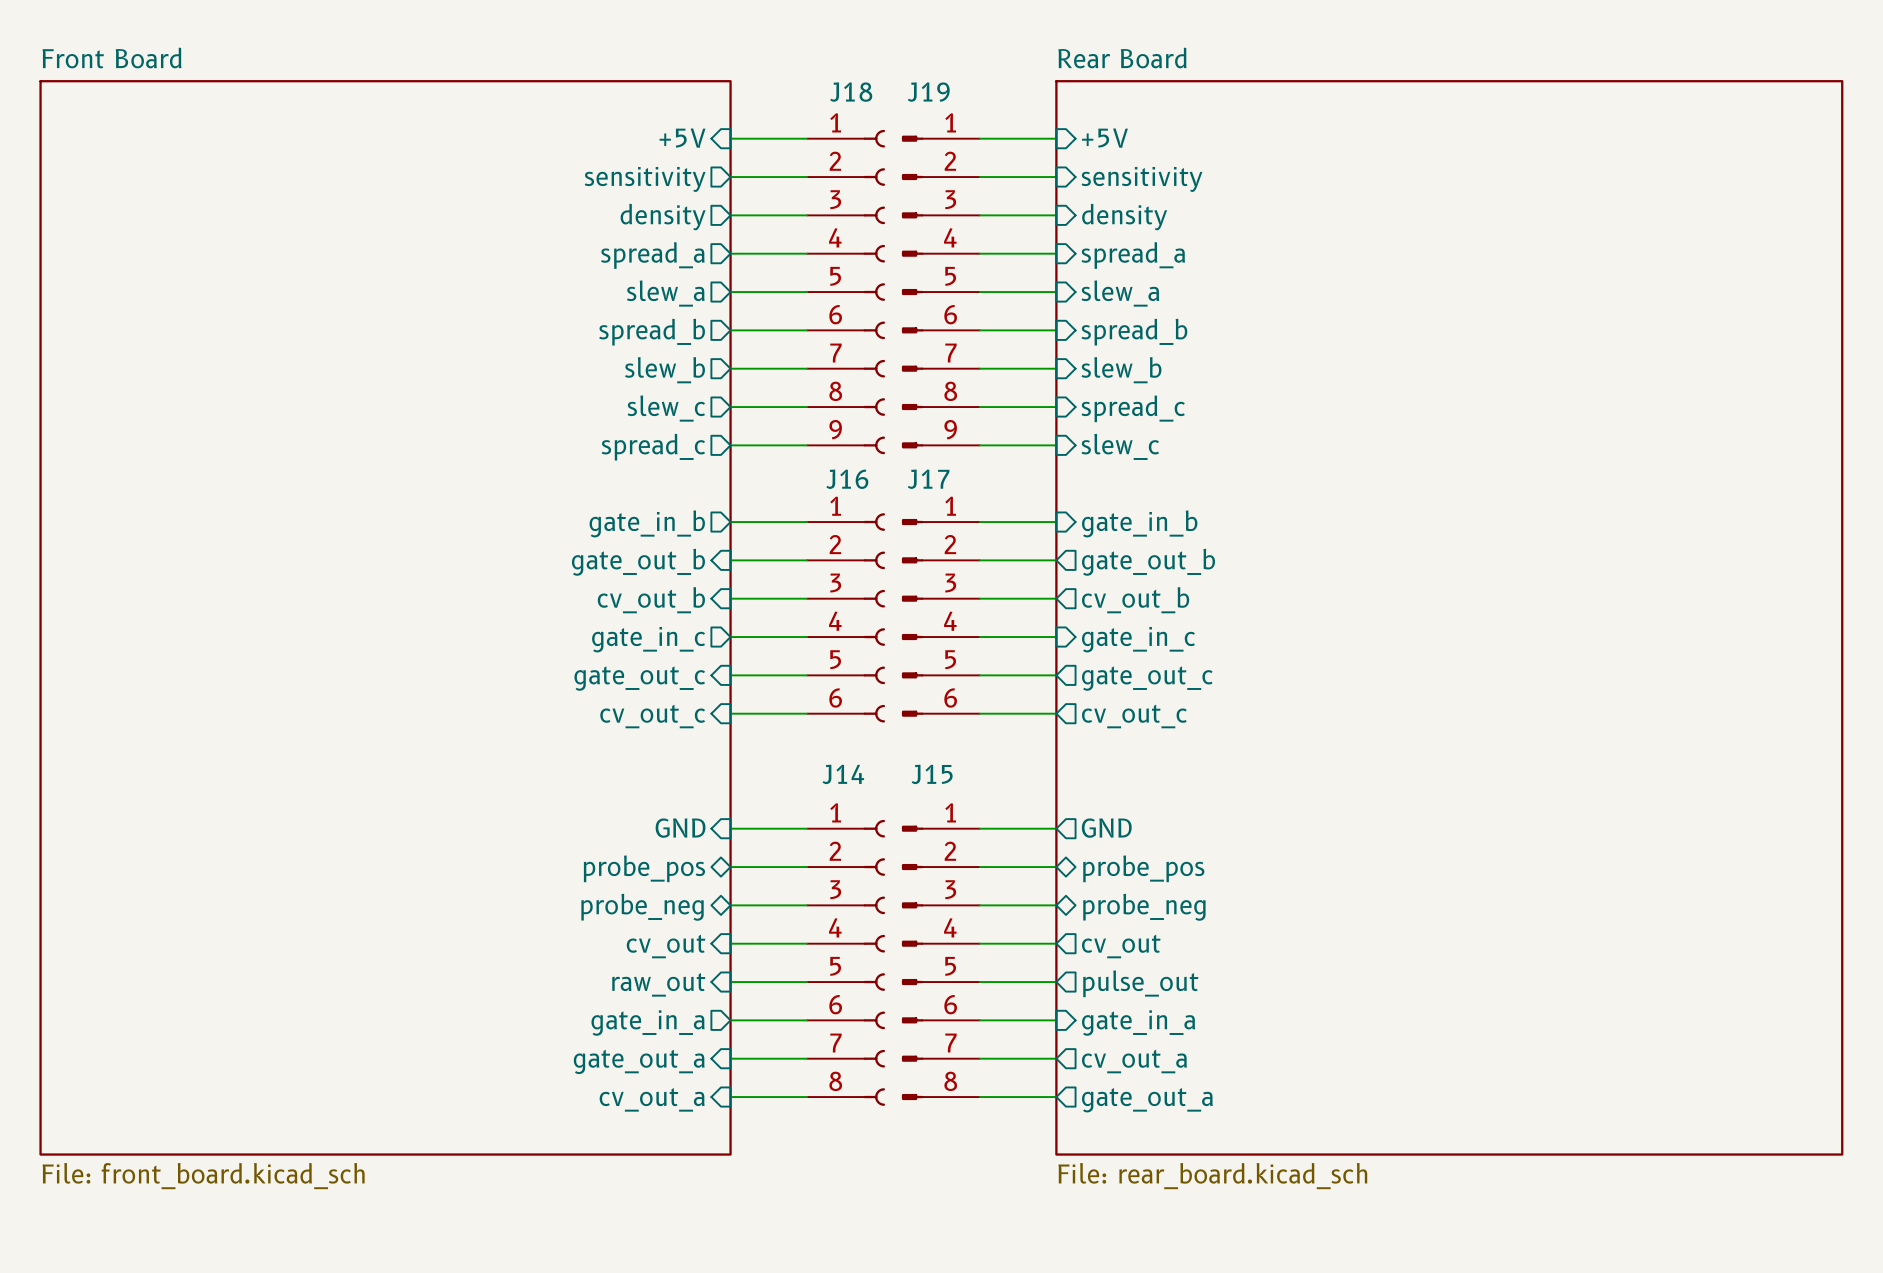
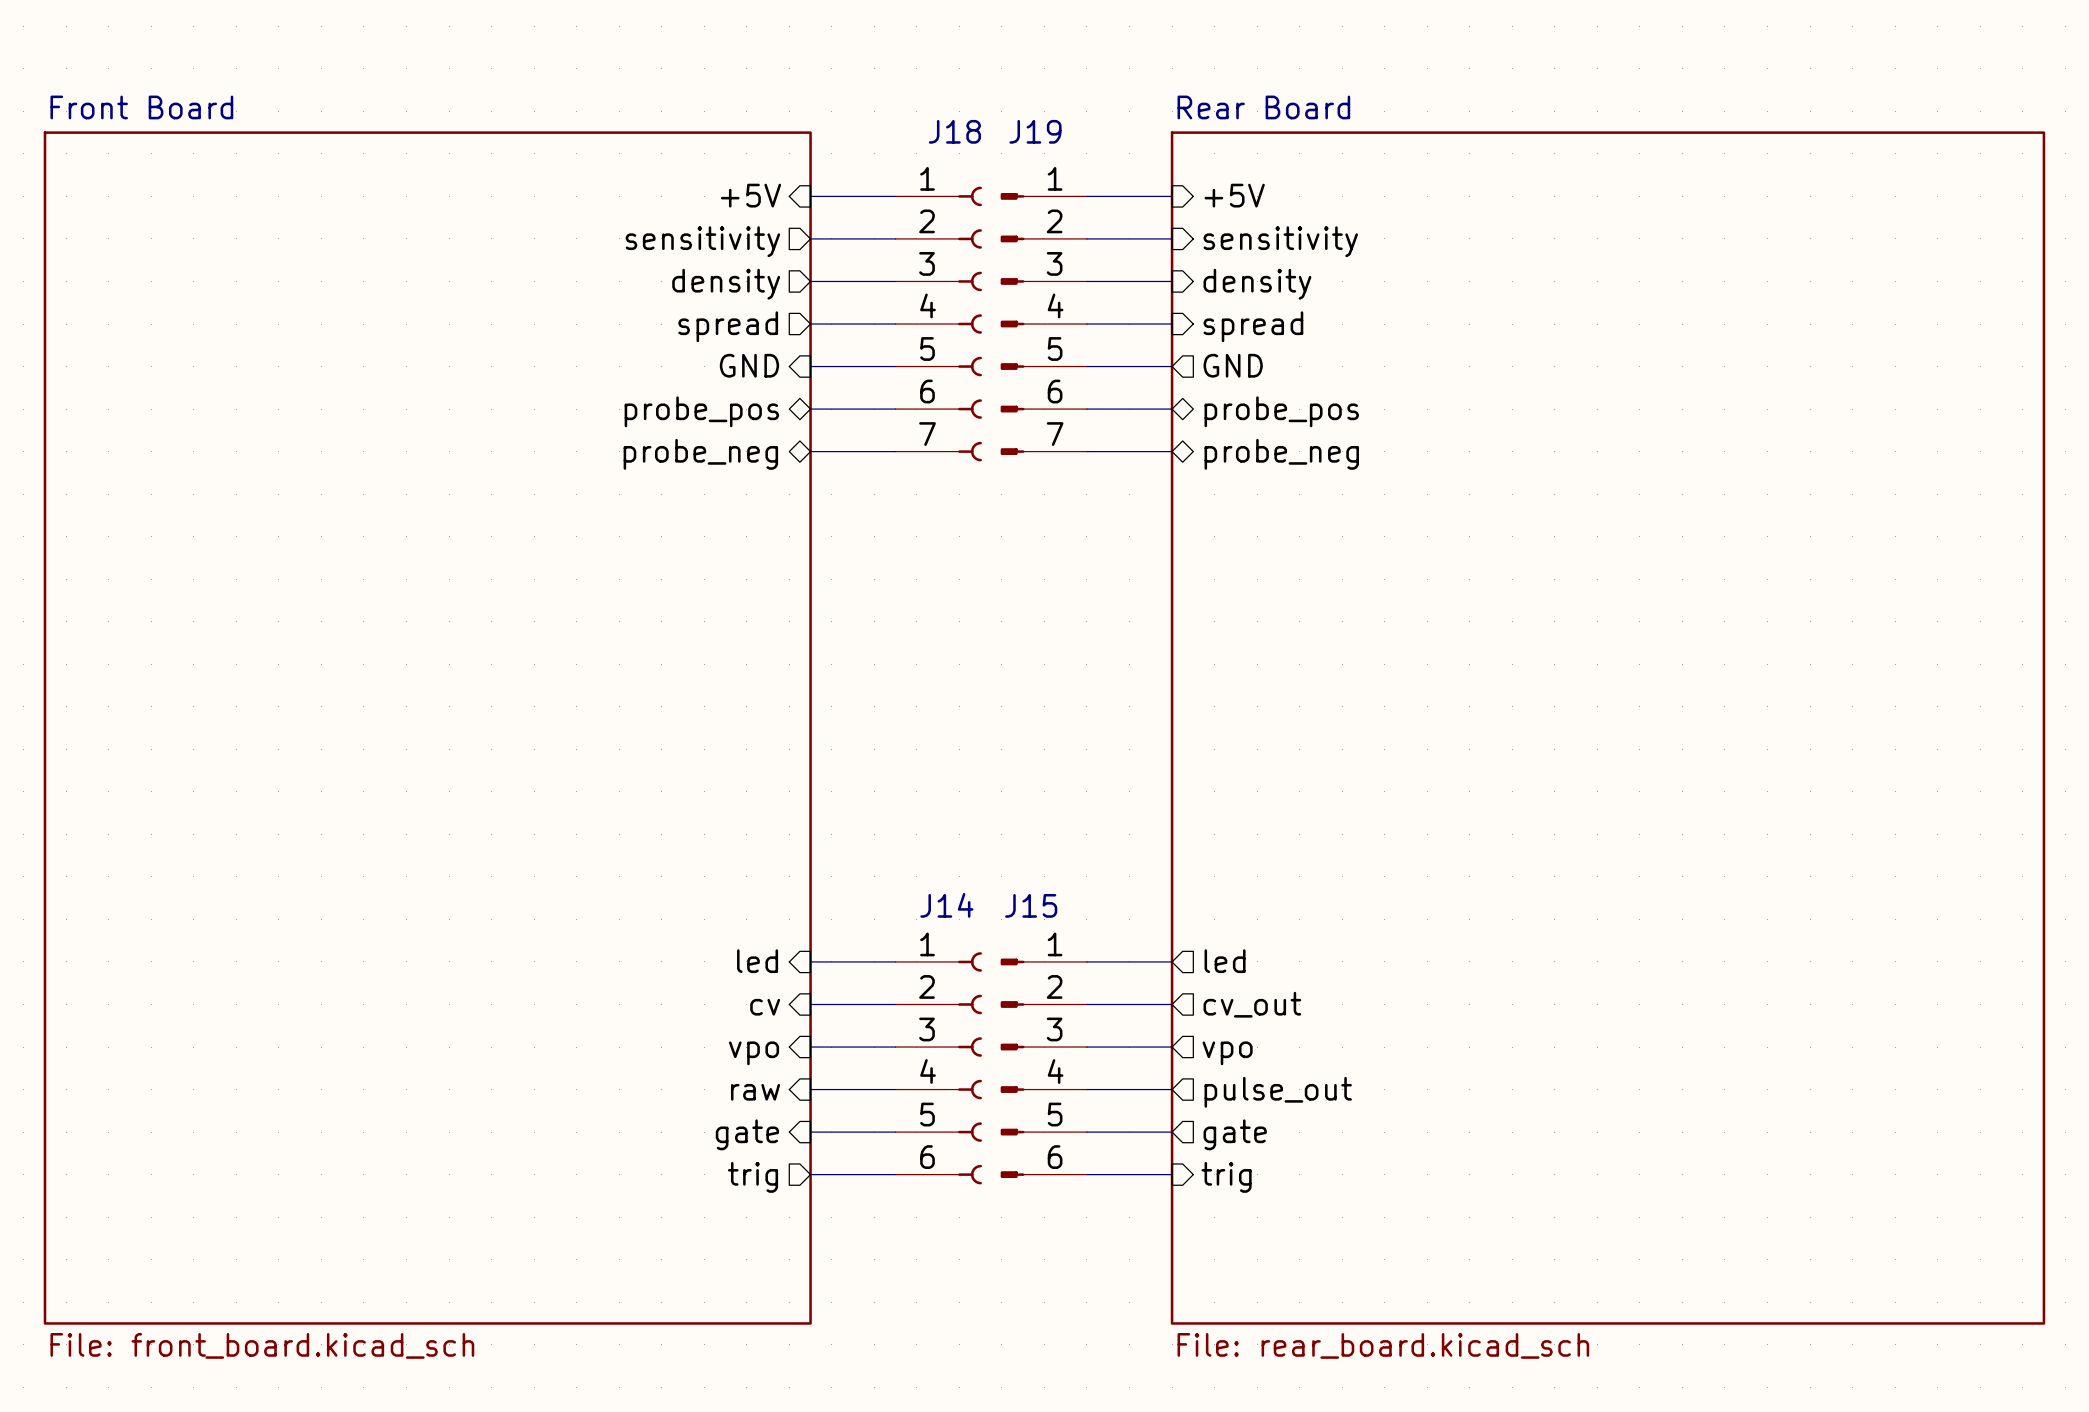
J18 symbol: [807, 129, 886, 455] -> [895, 186, 982, 462]
J19 symbol: [901, 135, 980, 449] -> [1000, 193, 1087, 455]
sheet pin: +5V (682, 138) -> none
wire: (730, 138) (807, 138) -> none
wire: (979, 138) (1056, 138) -> none
sheet pin: +5V (1104, 138) -> none
sheet pin shape: output (645, 179) -> input (750, 195)
sheet pin: sensitivity (645, 179) -> +5V (750, 195)
sheet pin: sensitivity (1141, 179) -> +5V (1234, 195)
sheet pin: density (663, 217) -> sensitivity (702, 241)
sheet pin: density (1124, 217) -> sensitivity (1280, 241)
sheet pin: spread_a (652, 255) -> density (726, 284)
sheet pin: spread_a (1133, 255) -> density (1257, 284)
sheet pin: slew_a (665, 293) -> spread (728, 326)
sheet pin: slew_a (1120, 293) -> spread (1253, 326)
sheet pin shape: output (652, 332) -> input (749, 365)
sheet pin: spread_b (652, 332) -> GND (749, 365)
sheet pin shape: input (1134, 332) -> output (1233, 365)
sheet pin: spread_b (1134, 332) -> GND (1233, 365)
sheet pin shape: output (665, 370) -> bidirectional (701, 411)
sheet pin: slew_b (665, 370) -> probe_pos (701, 411)
sheet pin shape: input (1121, 370) -> bidirectional (1281, 411)
sheet pin: slew_b (1121, 370) -> probe_pos (1281, 411)
sheet pin shape: output (666, 408) -> bidirectional (700, 454)
sheet pin: slew_c (666, 408) -> probe_neg (700, 454)
sheet pin shape: input (1133, 408) -> bidirectional (1281, 454)
sheet pin: spread_c (1133, 408) -> probe_neg (1281, 454)
wire: (730, 445) (807, 445) -> none
wire: (979, 445) (1056, 445) -> none
sheet pin: slew_c (1120, 446) -> none
sheet pin: spread_c (653, 447) -> none
wire: (730, 522) (807, 522) -> none
wire: (979, 522) (1056, 522) -> none
sheet pin: gate_in_b (647, 523) -> none
sheet pin: gate_in_b (1139, 523) -> none
wire: (730, 560) (807, 560) -> none
wire: (979, 560) (1056, 560) -> none
sheet pin: gate_out_b (638, 562) -> none
sheet pin: gate_out_b (1148, 562) -> none
wire: (730, 598) (807, 598) -> none
wire: (979, 598) (1056, 598) -> none
sheet pin: cv_out_b (651, 600) -> none
sheet pin: cv_out_b (1135, 600) -> none
sheet Front Board position: (385, 617) -> (427, 728)
J16: (846, 617) -> none
J17: (940, 617) -> none
sheet Rear Board position: (1449, 617) -> (1608, 728)
wire: (730, 637) (807, 637) -> none
wire: (979, 637) (1056, 637) -> none
sheet pin: gate_in_c (648, 639) -> none
sheet pin: gate_in_c (1138, 639) -> none
wire: (730, 675) (807, 675) -> none
wire: (979, 675) (1056, 675) -> none
sheet pin: gate_out_c (639, 678) -> none
sheet pin: gate_out_c (1147, 678) -> none
wire: (730, 713) (807, 713) -> none
wire: (979, 713) (1056, 713) -> none
sheet pin: cv_out_c (652, 716) -> none
sheet pin: cv_out_c (1134, 716) -> none
J14 name position: J14 (843, 774) -> J14 (946, 905)
J15 name position: J15 (932, 774) -> J15 (1031, 905)
J14 symbol: [807, 819, 886, 1106] -> [895, 952, 982, 1185]
J15 symbol: [901, 825, 980, 1101] -> [1000, 958, 1087, 1179]
sheet pin: GND (680, 828) -> none
wire: (730, 828) (807, 828) -> none
wire: (979, 828) (1056, 828) -> none
sheet pin: GND (1106, 828) -> none
sheet pin shape: bidirectional (644, 868) -> input (757, 961)
sheet pin: probe_pos (644, 868) -> led (757, 961)
sheet pin shape: bidirectional (1143, 868) -> output (1225, 961)
sheet pin: probe_pos (1143, 868) -> led (1225, 961)
sheet pin shape: bidirectional (642, 907) -> input (765, 1007)
sheet pin: probe_neg (642, 907) -> cv (765, 1007)
sheet pin shape: bidirectional (1144, 907) -> output (1252, 1004)
sheet pin: probe_neg (1144, 907) -> cv_out (1252, 1004)
sheet pin: cv_out (666, 946) -> vpo (754, 1053)
sheet pin: cv_out (1121, 946) -> vpo (1227, 1053)
sheet pin: raw_out (658, 984) -> raw (755, 1092)
sheet pin shape: output (648, 1023) -> input (747, 1134)
sheet pin: gate_in_a (648, 1023) -> gate (747, 1134)
sheet pin shape: input (1138, 1023) -> output (1235, 1134)
sheet pin: gate_in_a (1138, 1023) -> gate (1235, 1134)
sheet pin shape: input (639, 1061) -> output (753, 1177)
sheet pin: gate_out_a (639, 1061) -> trig (753, 1177)
sheet pin shape: output (1134, 1061) -> input (1226, 1177)
sheet pin: cv_out_a (1134, 1061) -> trig (1226, 1177)
wire: (730, 1097) (807, 1097) -> none
wire: (979, 1097) (1056, 1097) -> none
sheet pin: cv_out_a (652, 1099) -> none
sheet pin: gate_out_a (1147, 1100) -> none

